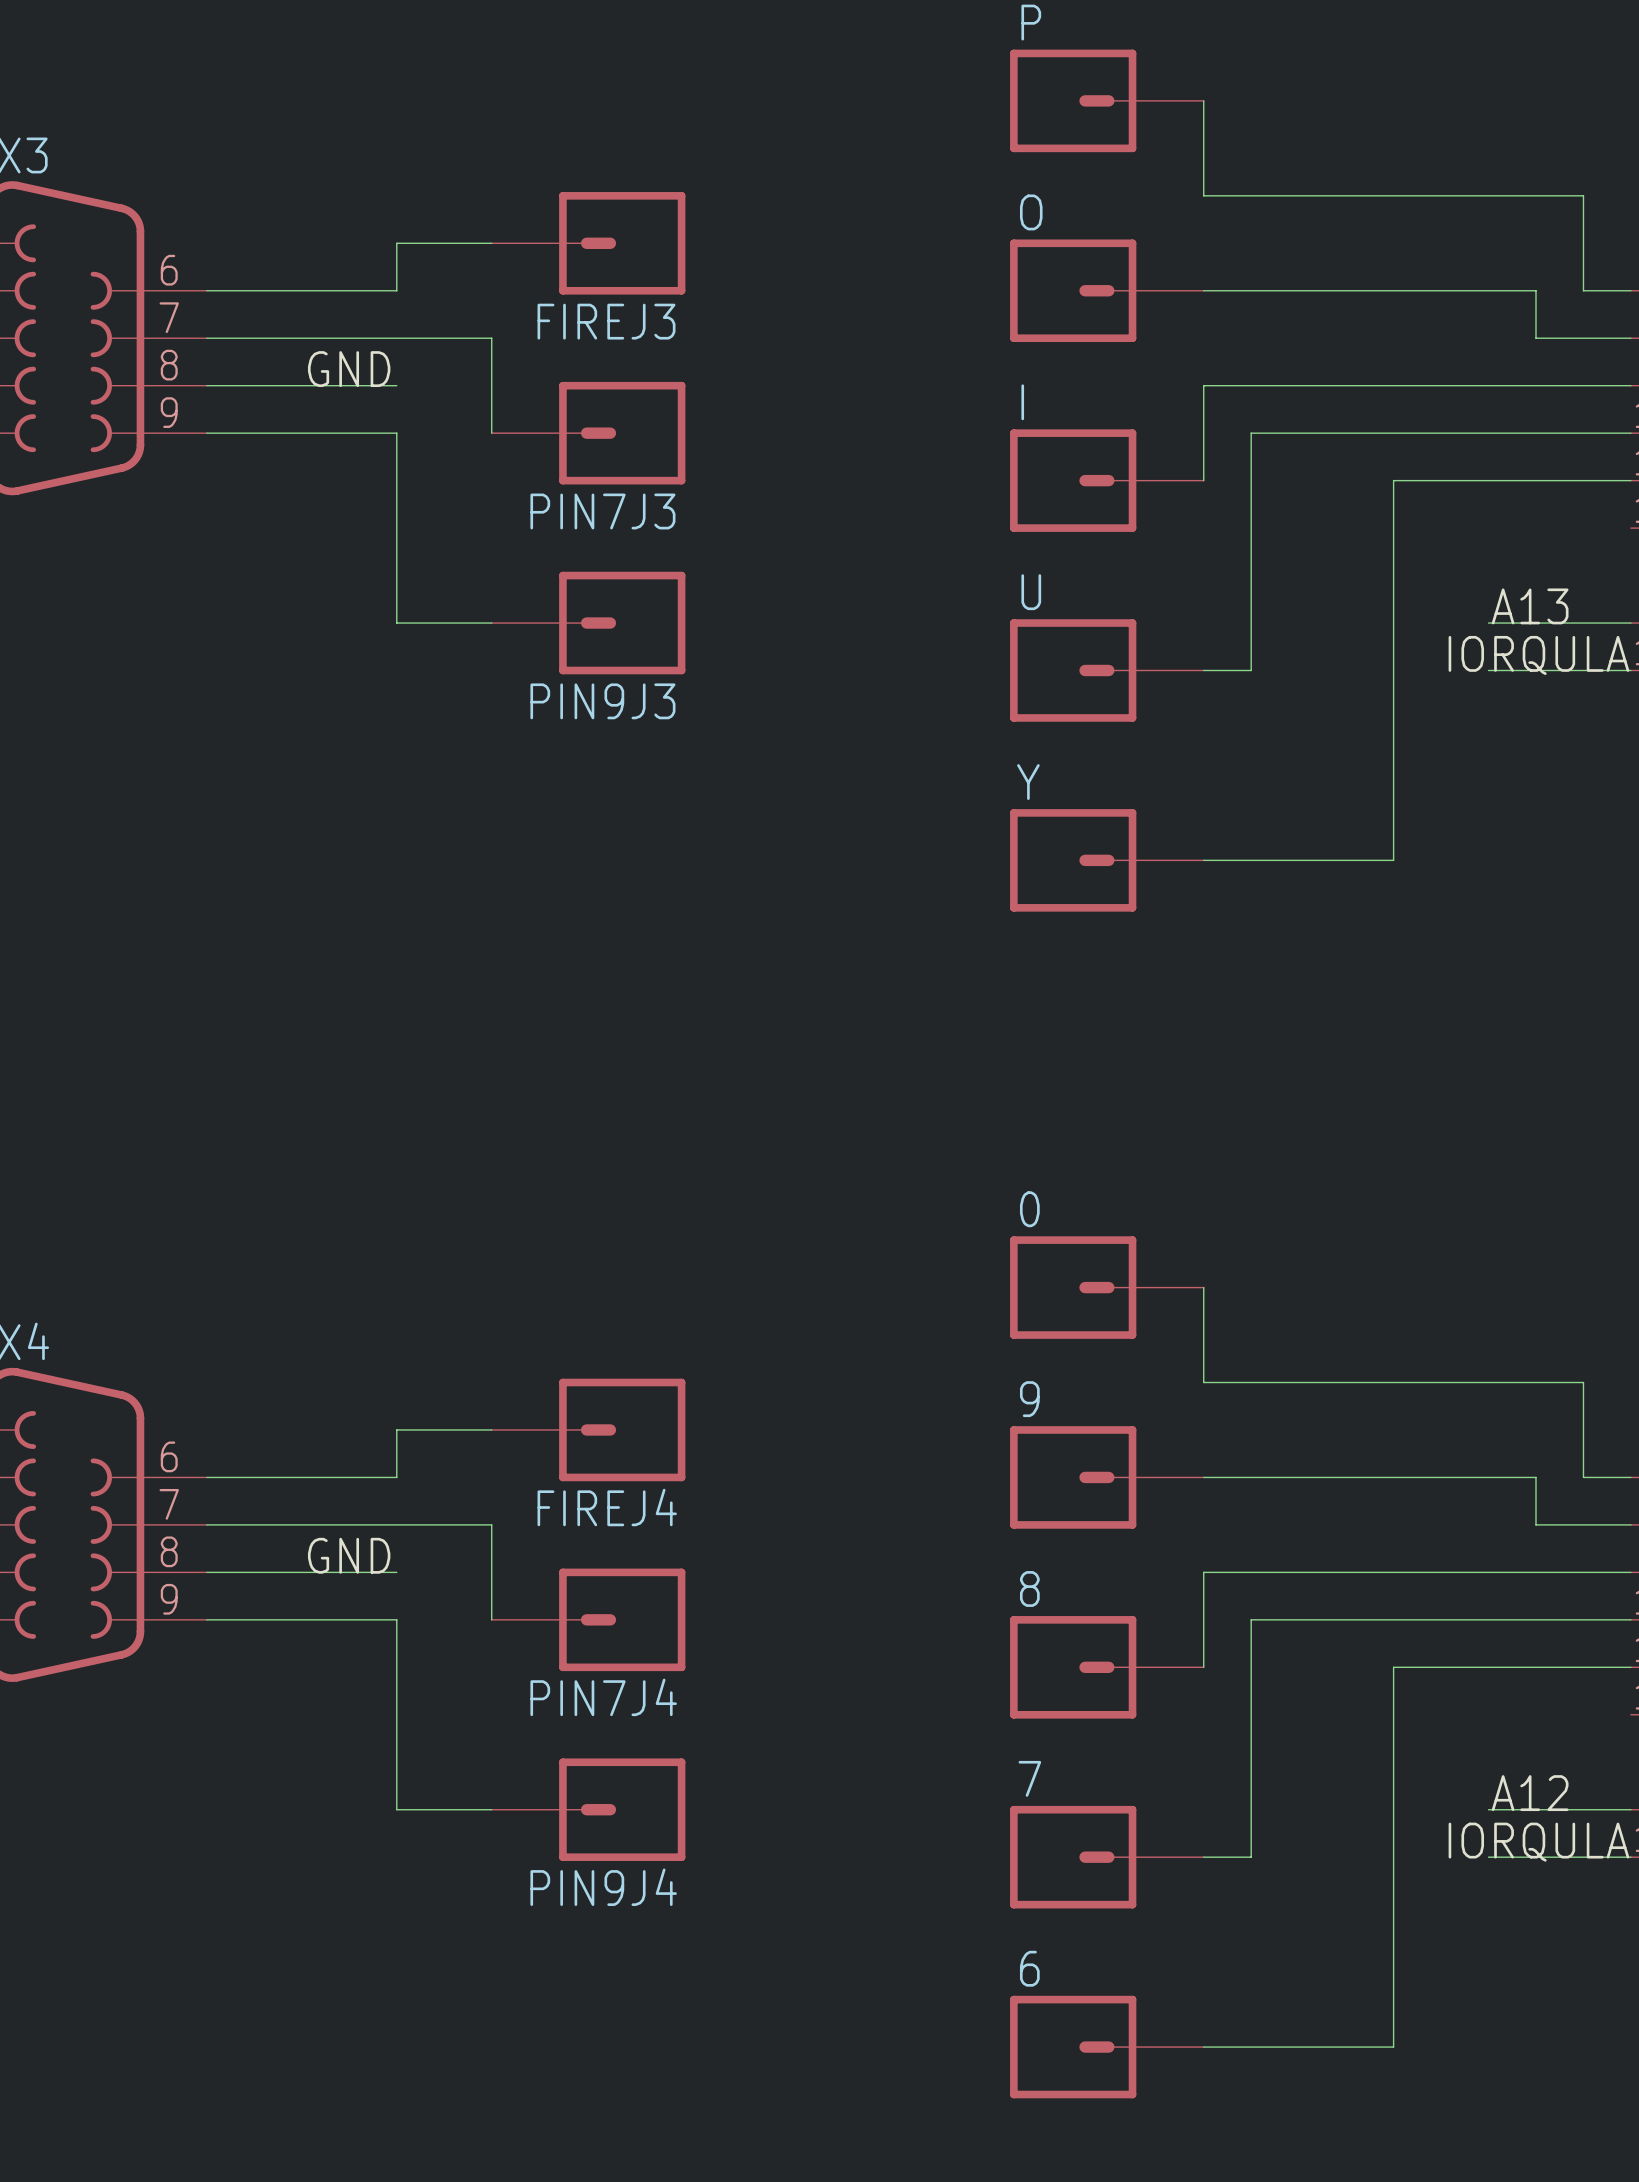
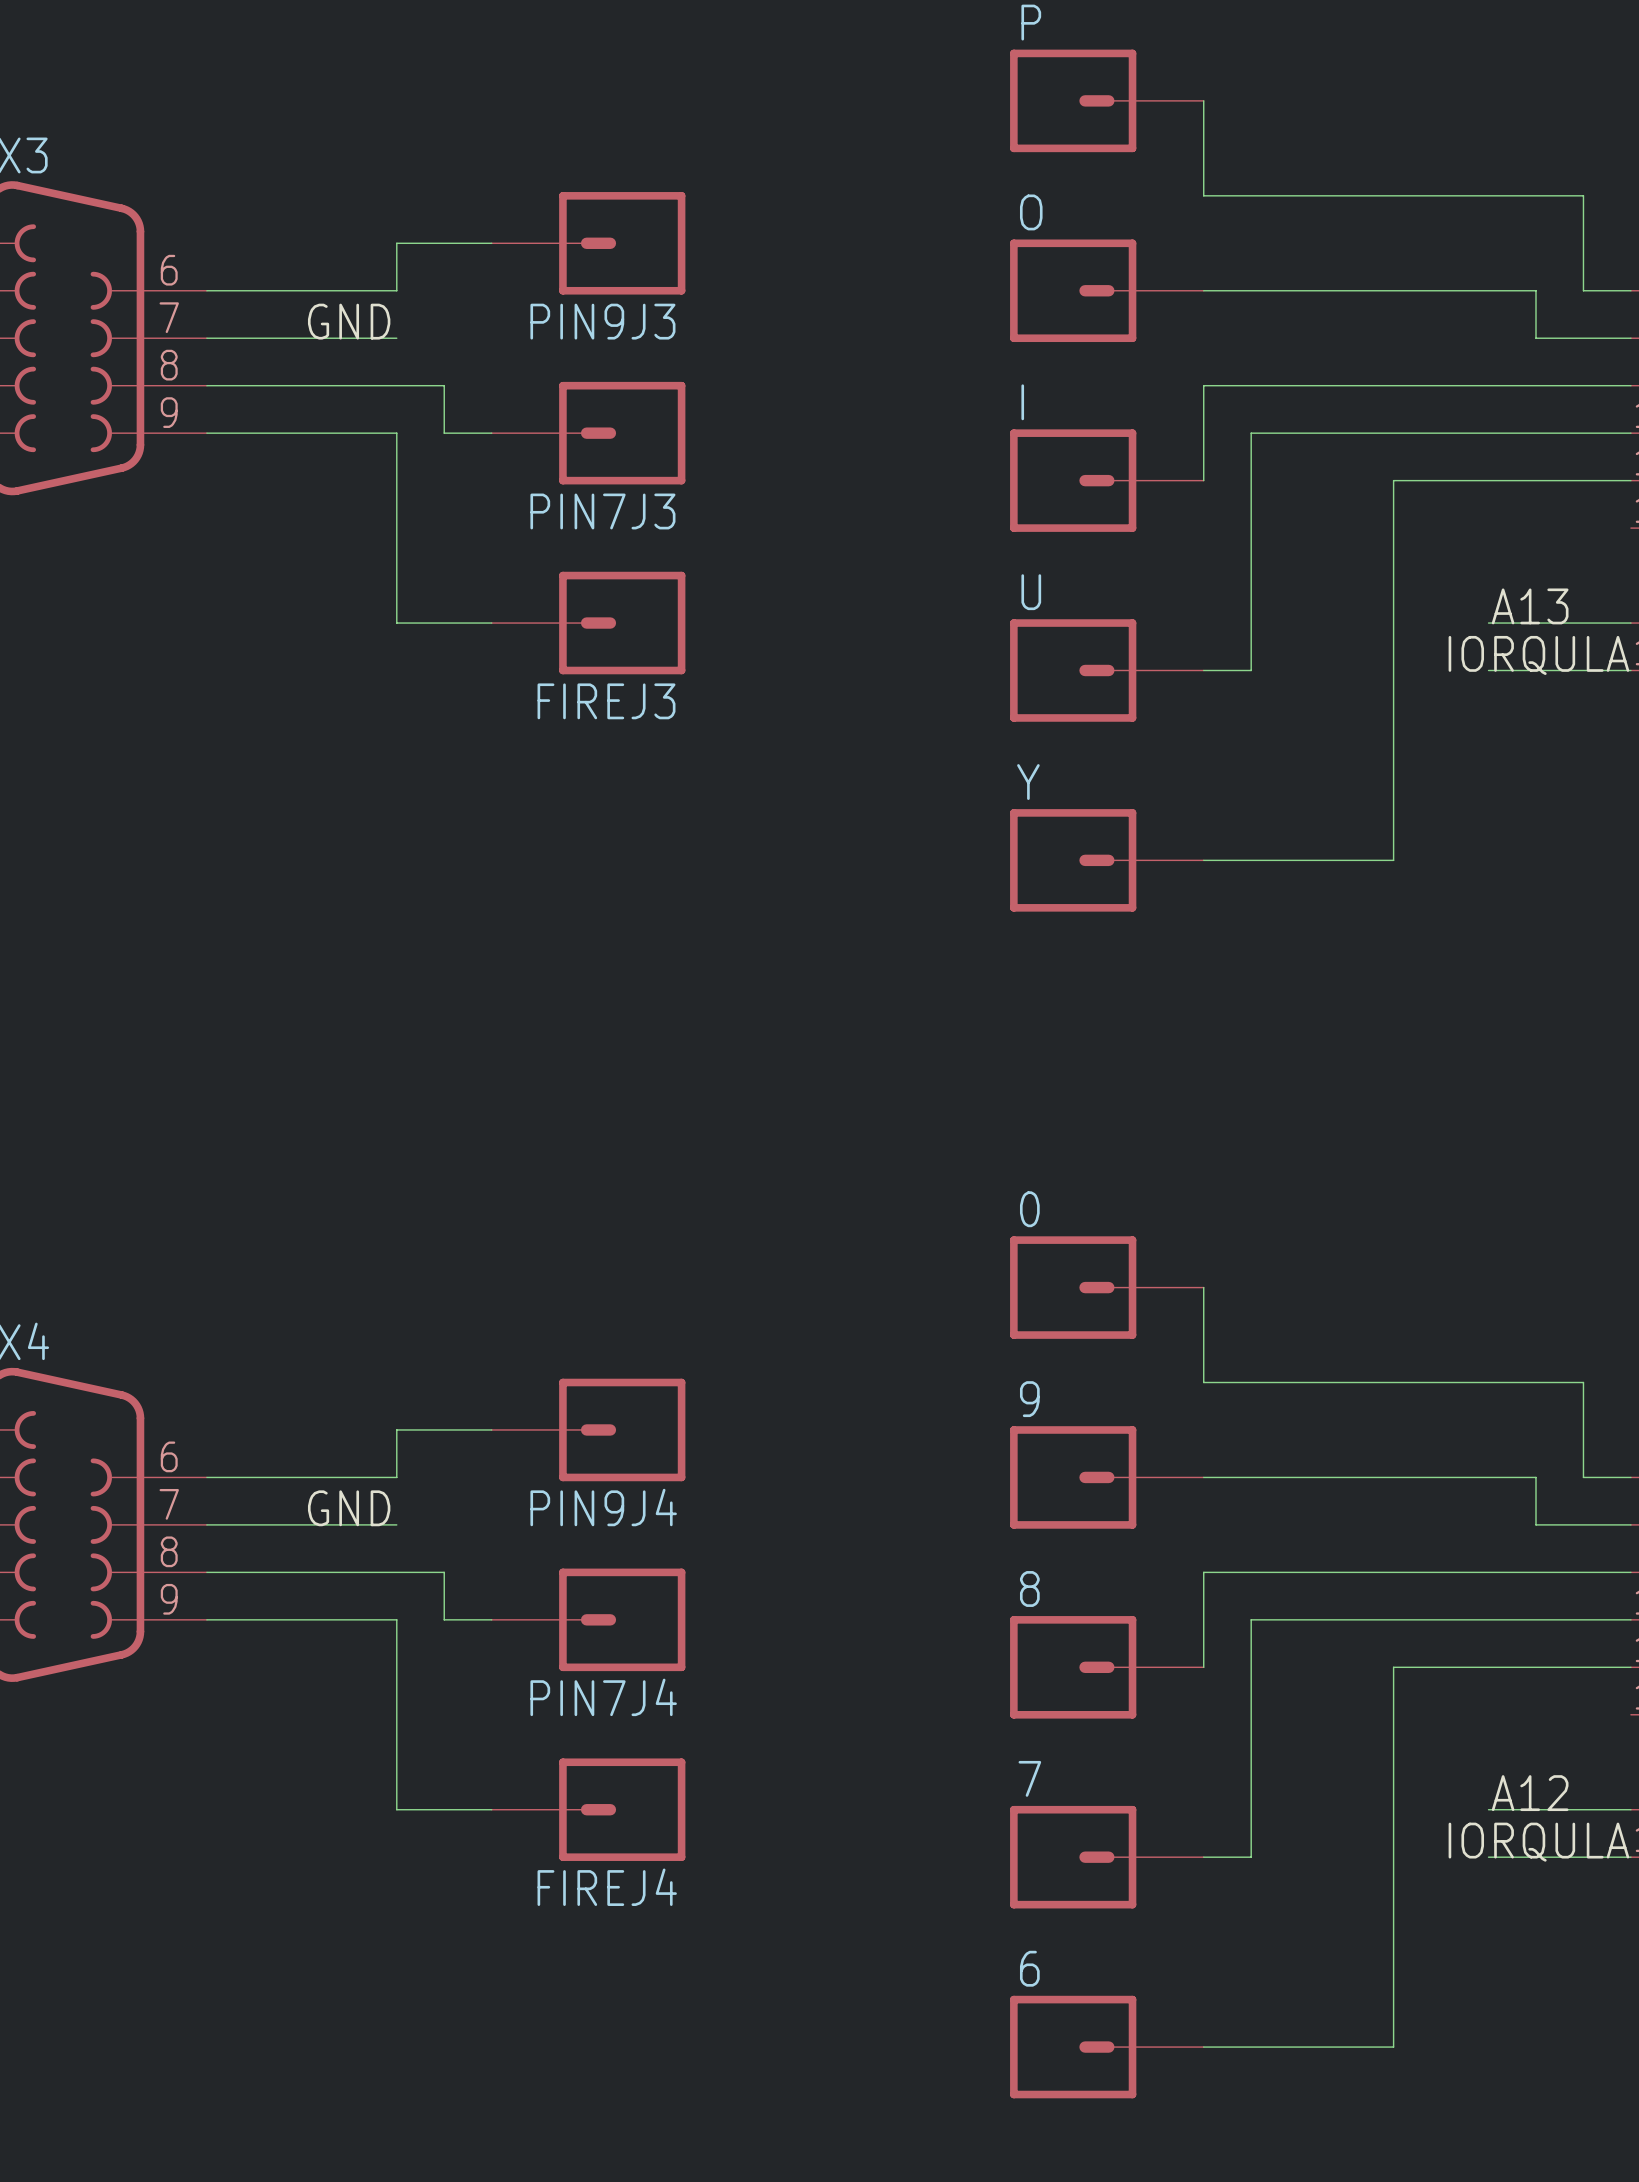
FIREJ3 name: FIREJ3 (606, 321) -> PIN9J3 (602, 321)
wire: (396, 338) (491, 338) (491, 433) -> (396, 385) (444, 385) (444, 433) (491, 433)
label position: GND (349, 369) -> GND (349, 321)
PIN9J3 name: PIN9J3 (602, 701) -> FIREJ3 (606, 701)
FIREJ4 name: FIREJ4 (607, 1507) -> PIN9J4 (603, 1507)
wire: (396, 1524) (491, 1524) (491, 1619) -> (396, 1572) (444, 1572) (444, 1619) (491, 1619)
label position: GND (349, 1555) -> GND (349, 1508)
PIN9J4 name: PIN9J4 (603, 1887) -> FIREJ4 (607, 1887)

